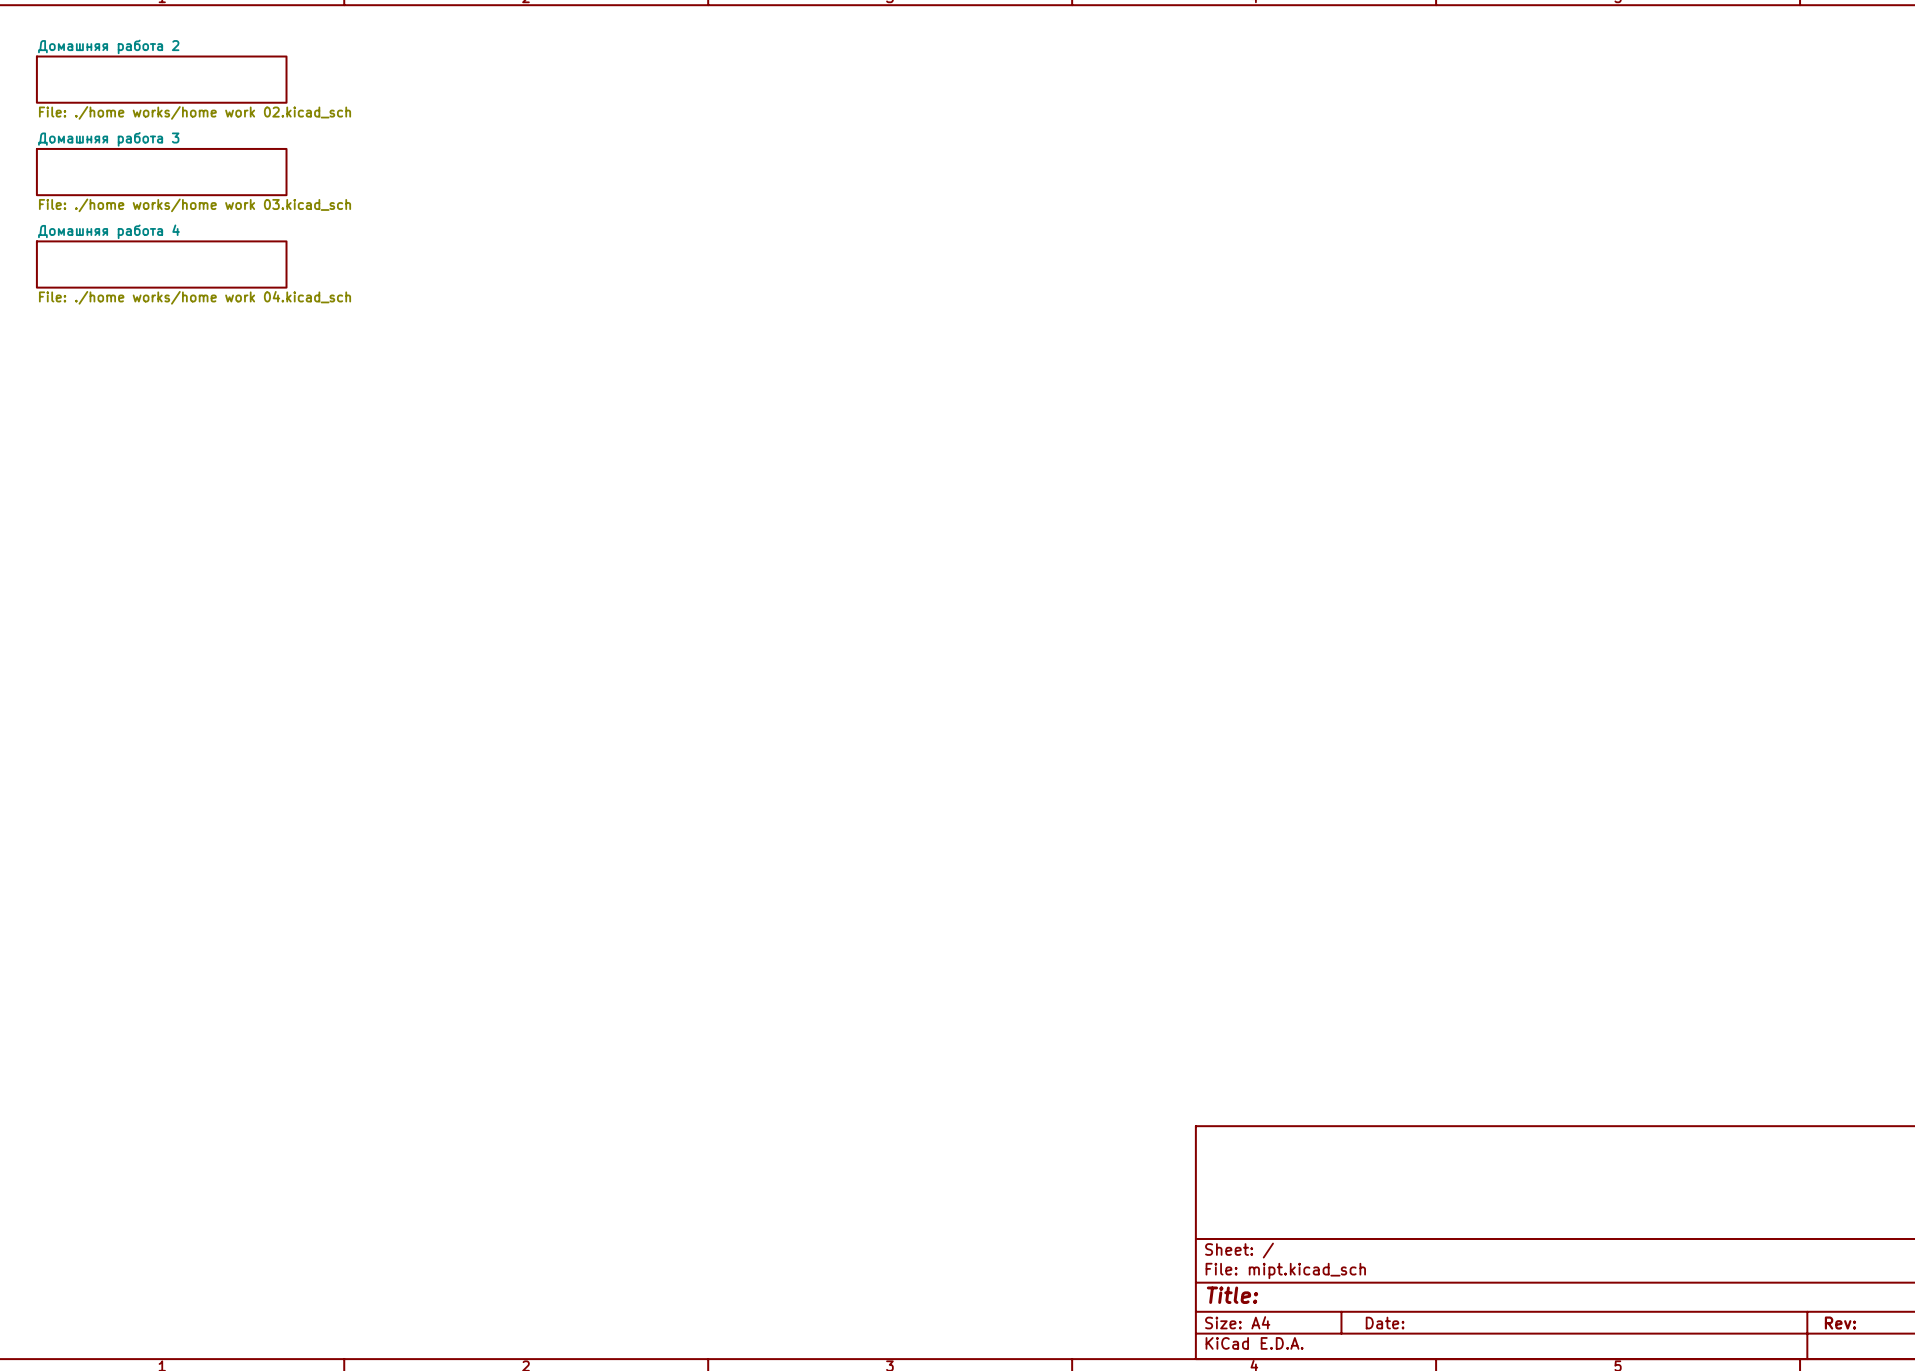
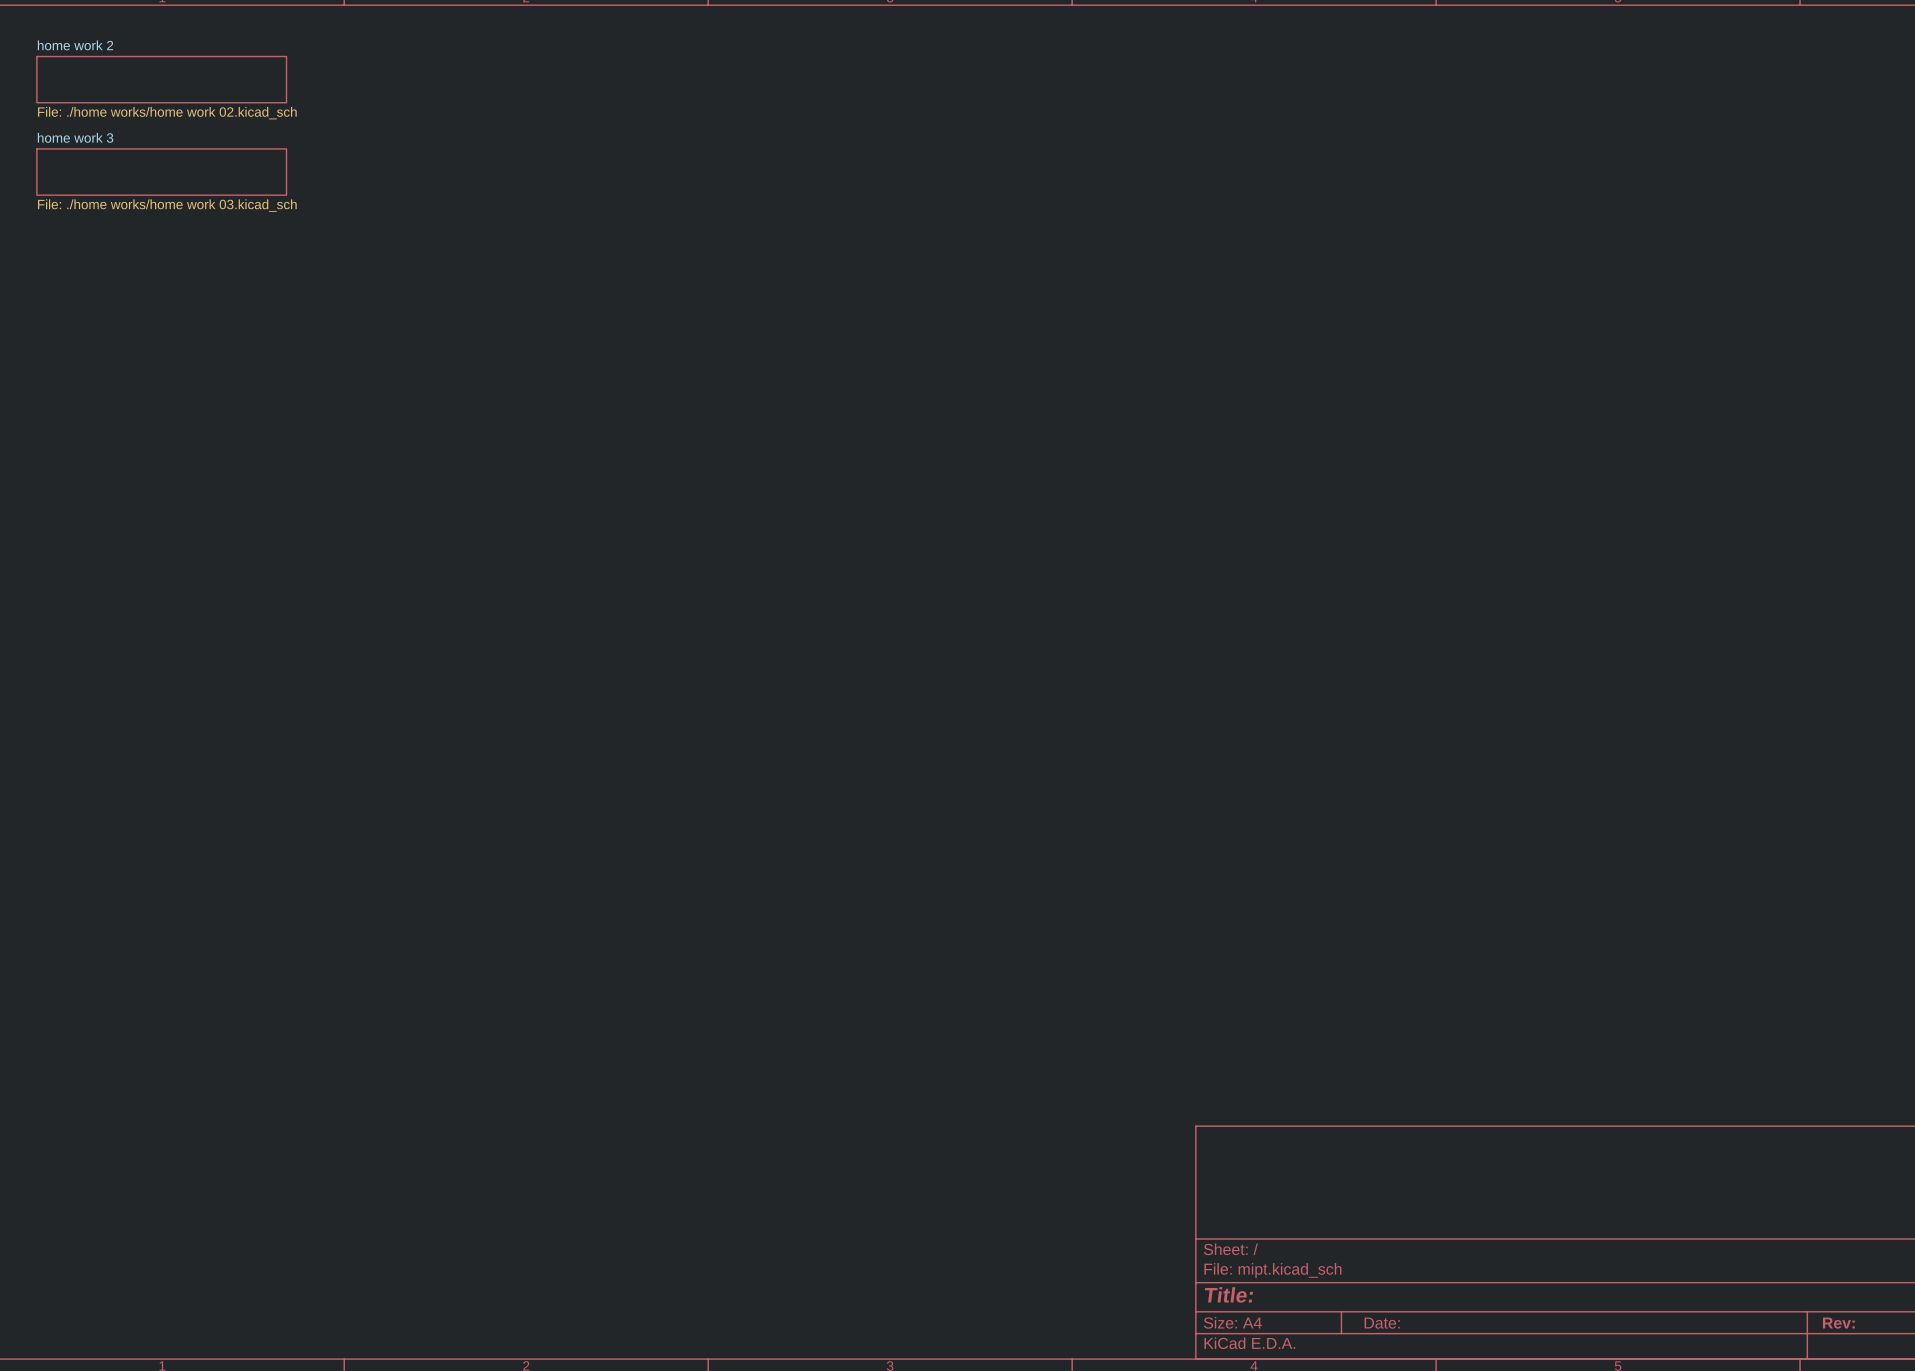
sheet Домашняя работа 2 name: Домашняя работа 2 (108, 46) -> home work 2 (75, 45)
sheet Домашняя работа 3 name: Домашняя работа 3 (108, 139) -> home work 3 (75, 137)
sheet Домашняя работа 4: File: ./home works/home work 04.kicad_sch (161, 264) -> none

